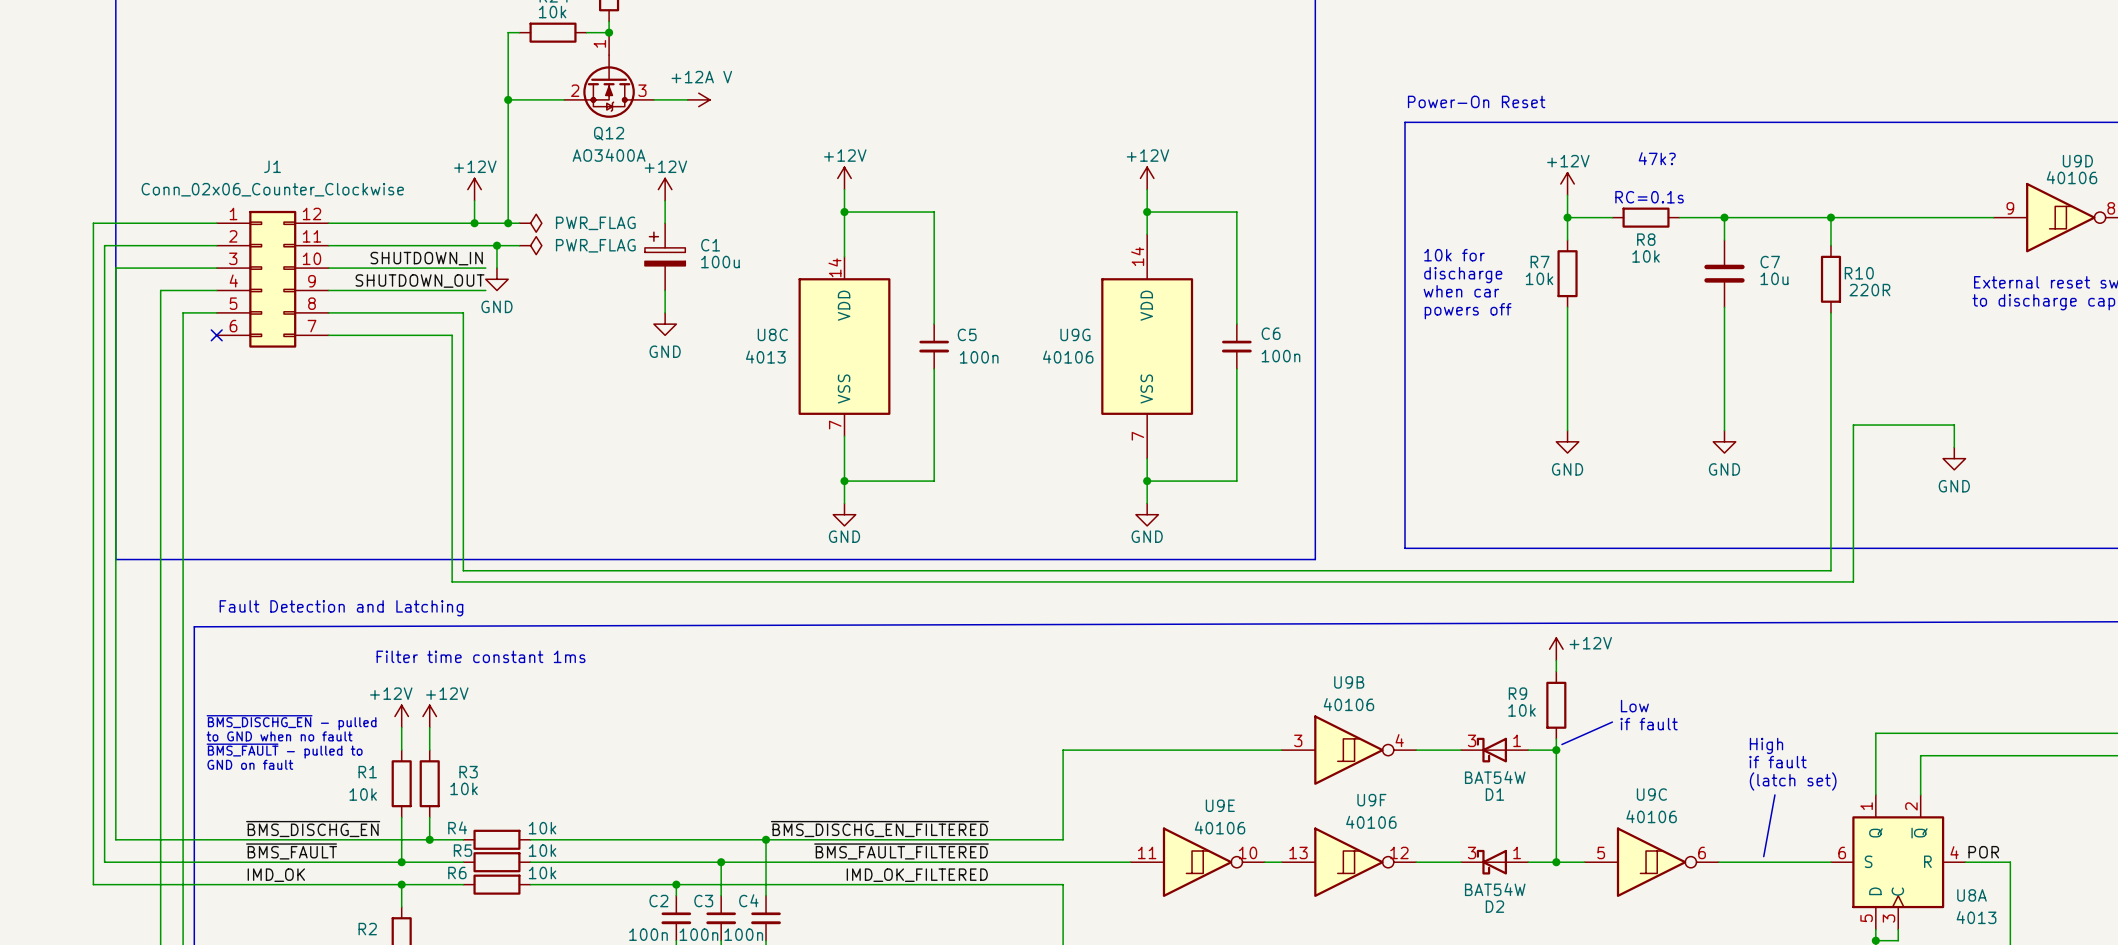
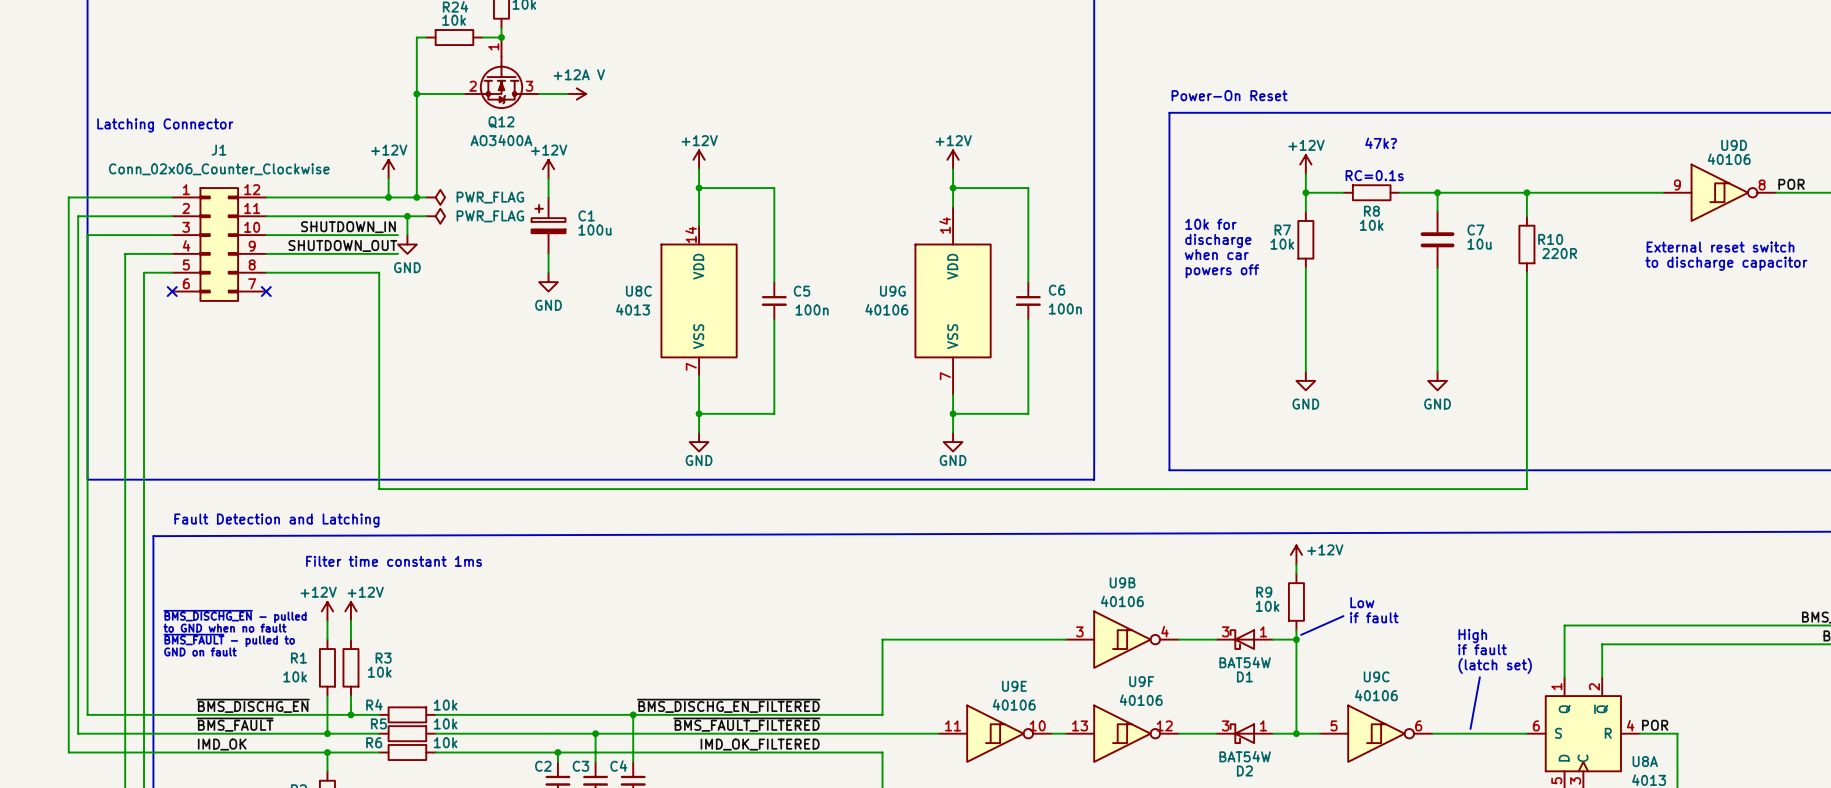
text: none -> Latching Connector (165, 125)
wire: (328, 335) (452, 335) (452, 581) (1853, 581) (1853, 425) (1954, 425) (1954, 447) -> none
no-connect mark: none -> (266, 291)
power symbol: GND (1954, 458) -> none

